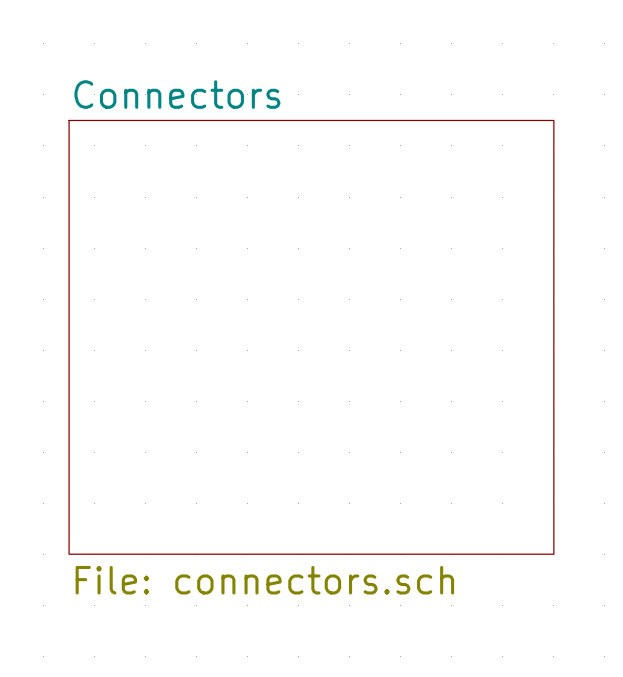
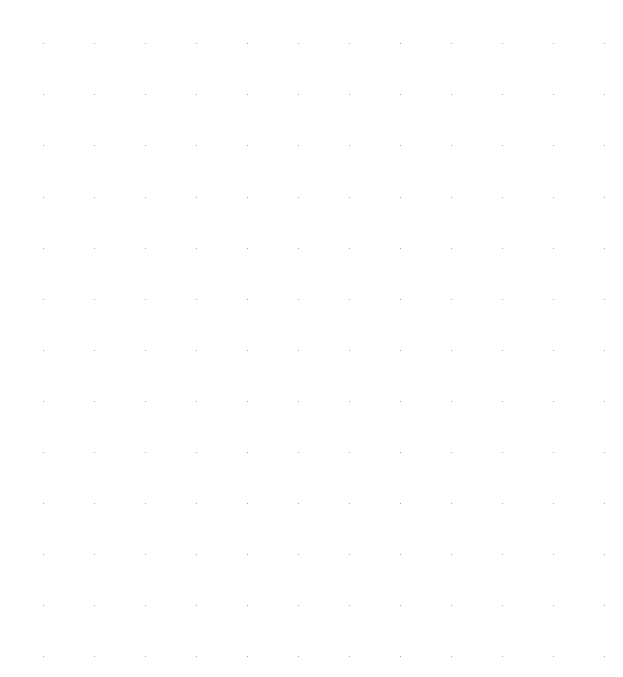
sheet Connectors: File: connectors.sch (311, 337) -> none

